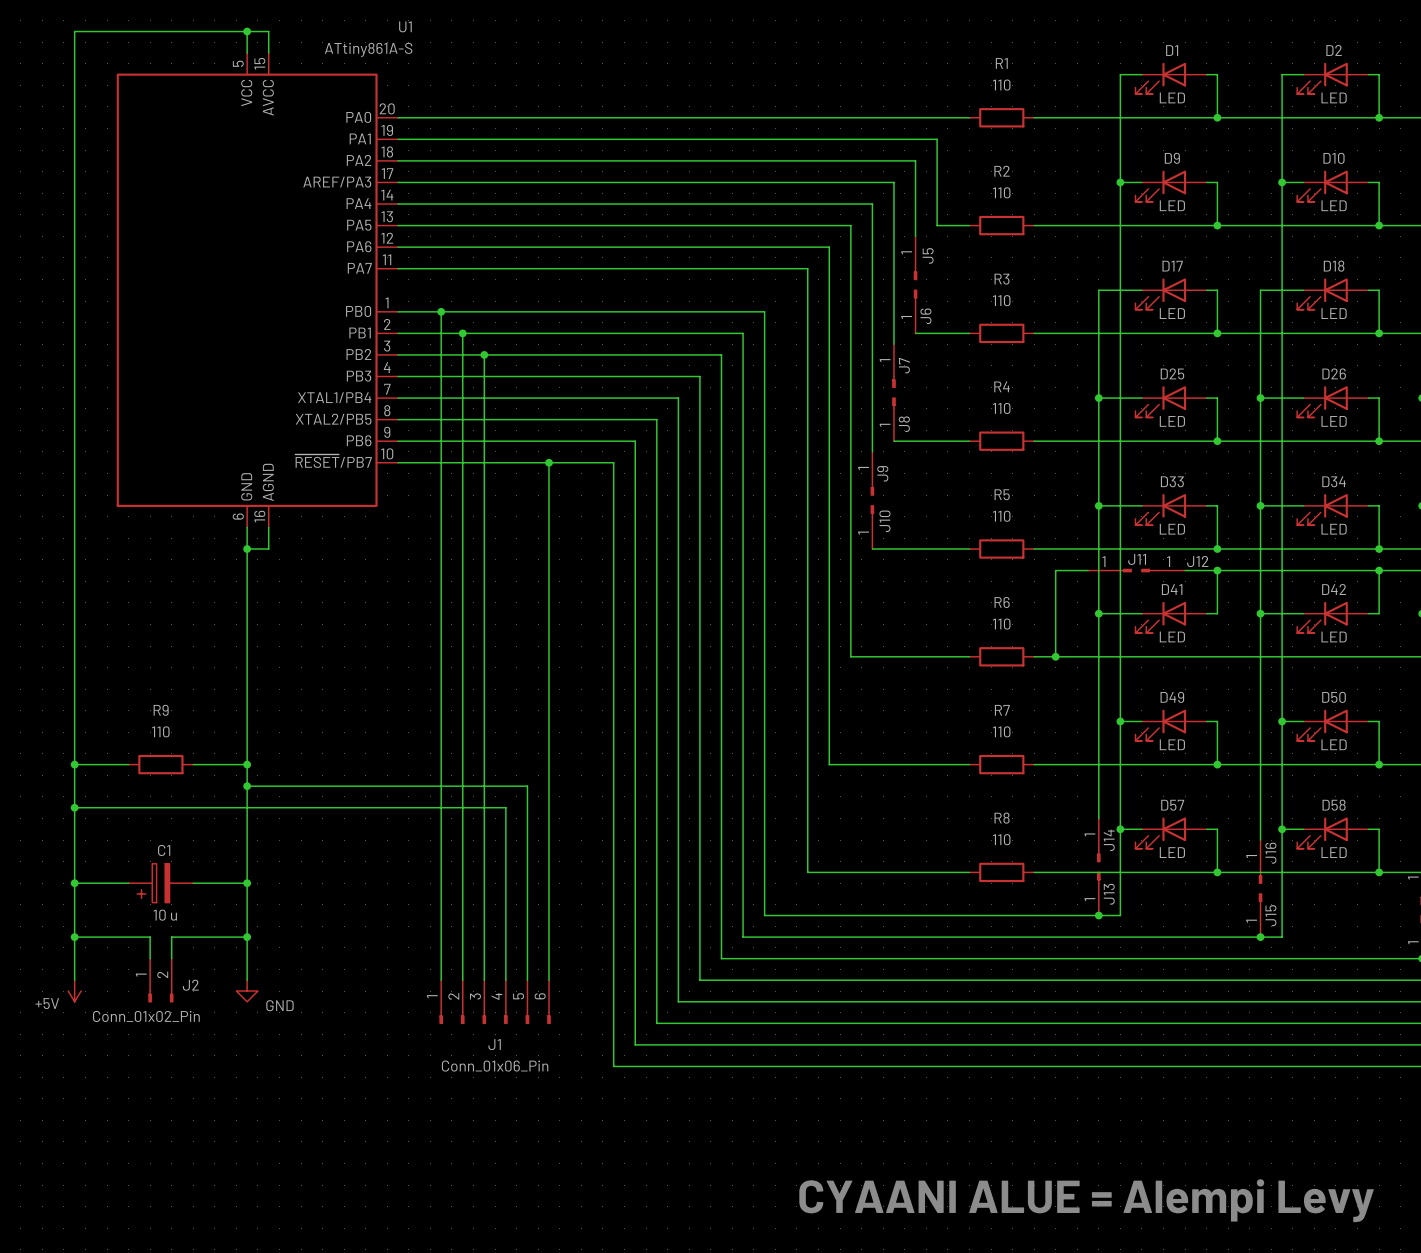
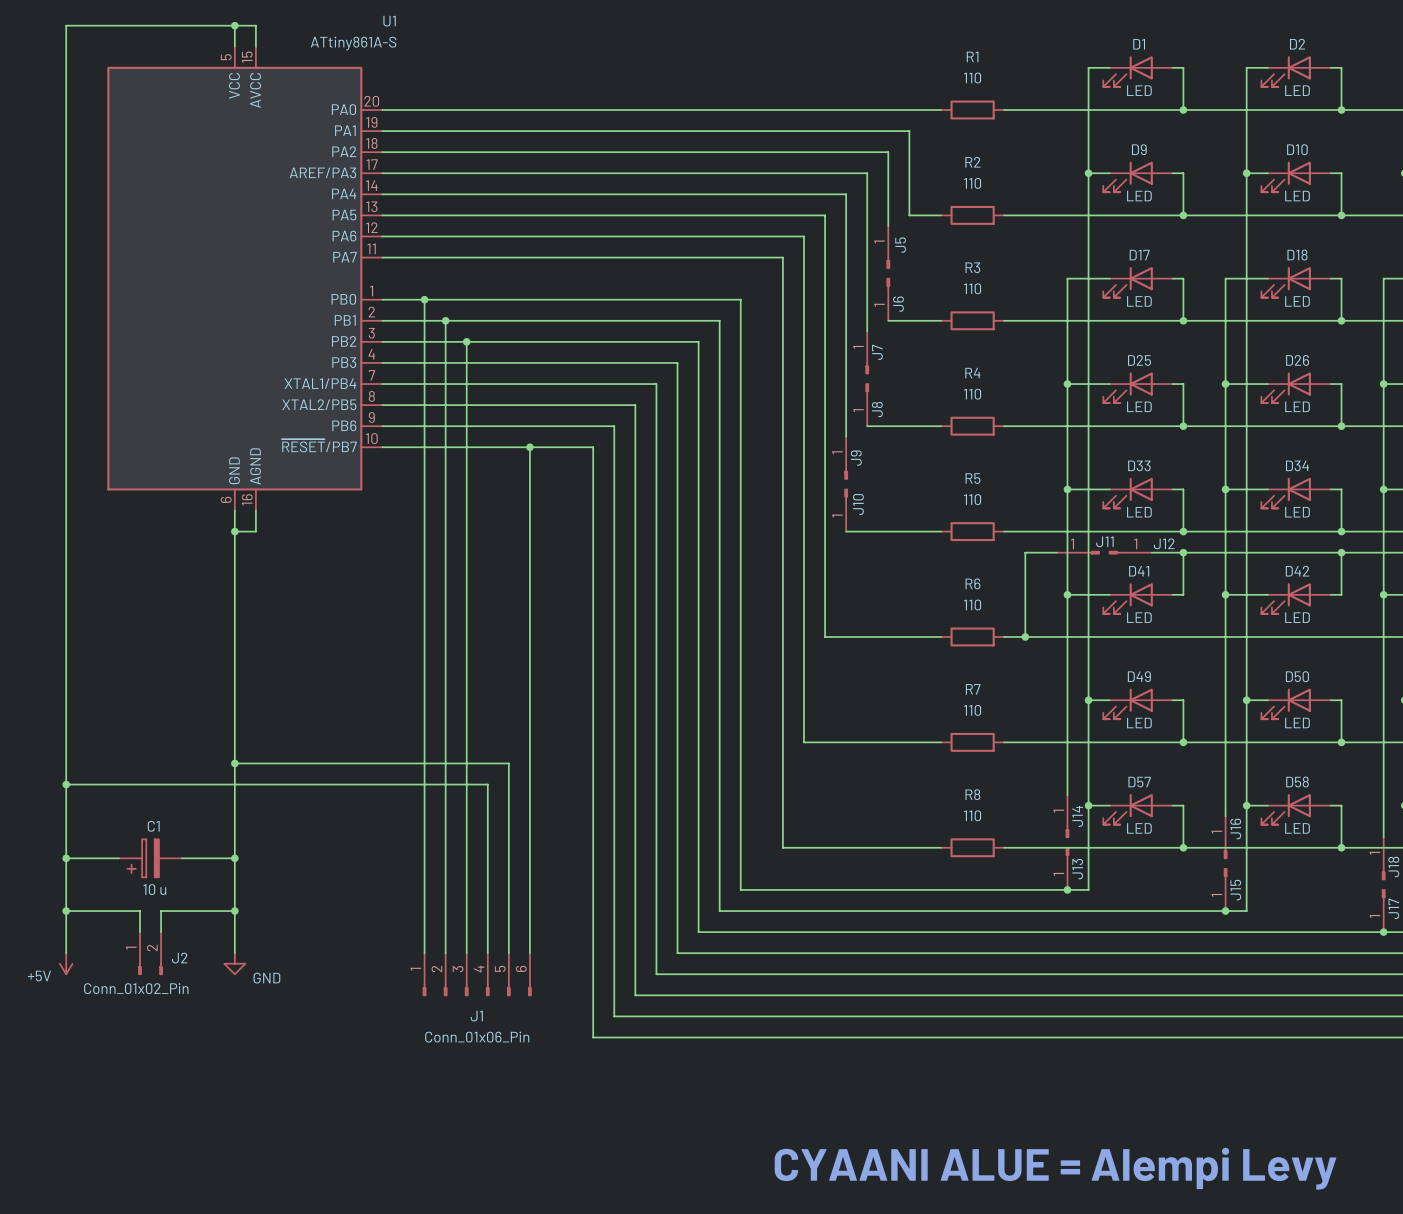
wire: (74, 764) (128, 764) -> none
junction: (74, 764) -> none
R9: 110 (160, 764) -> none
wire: (193, 764) (247, 764) -> none
junction: (247, 764) -> none

